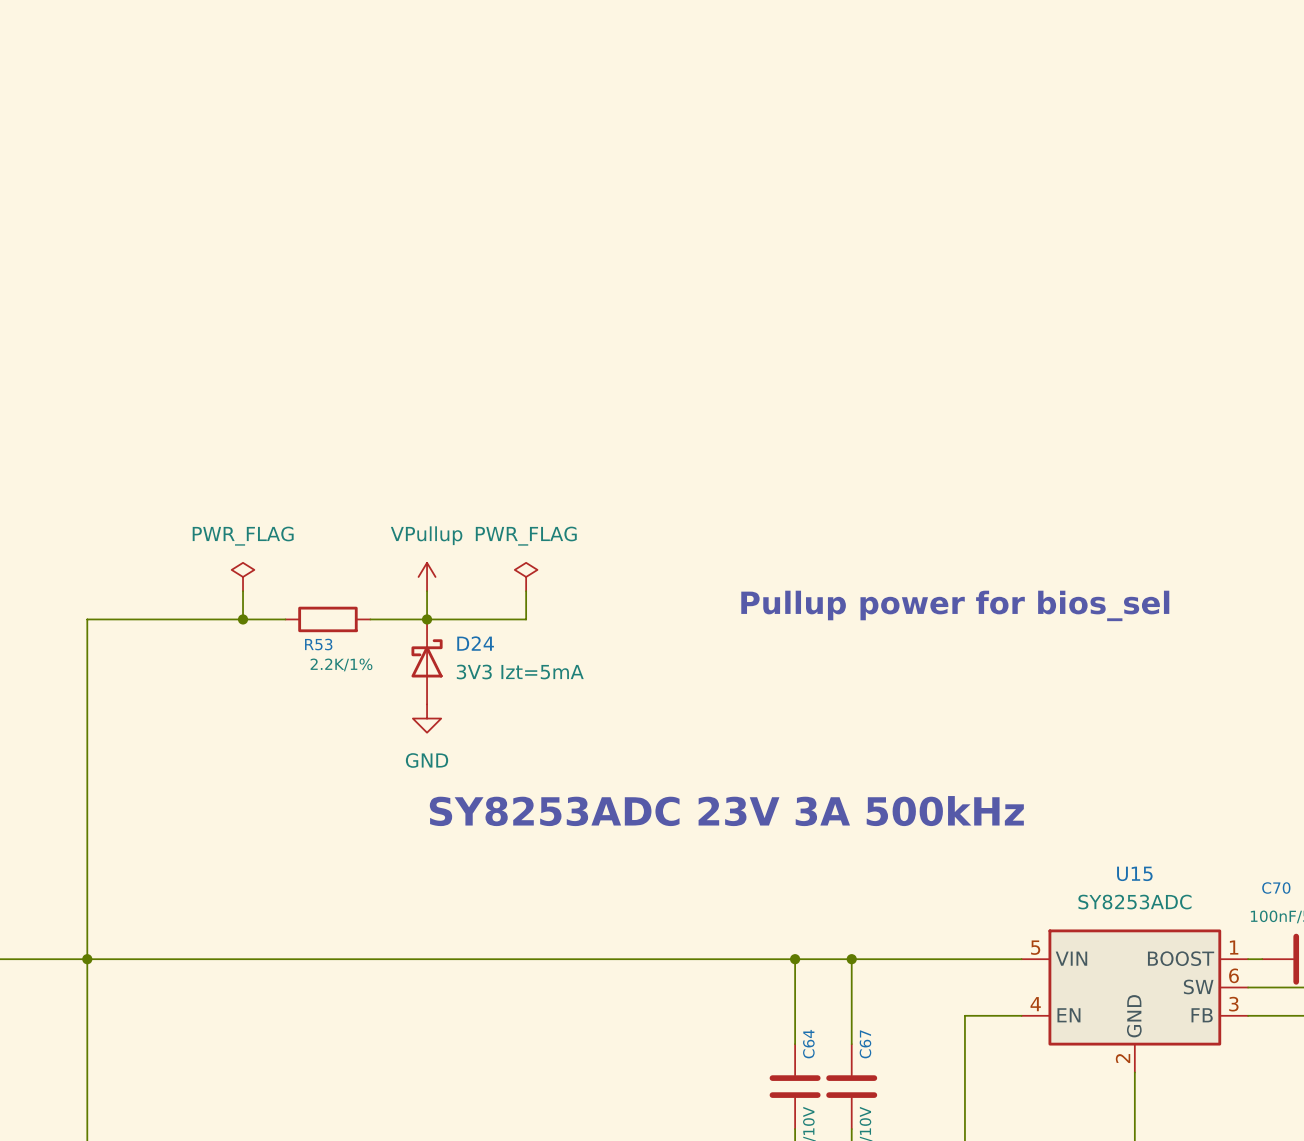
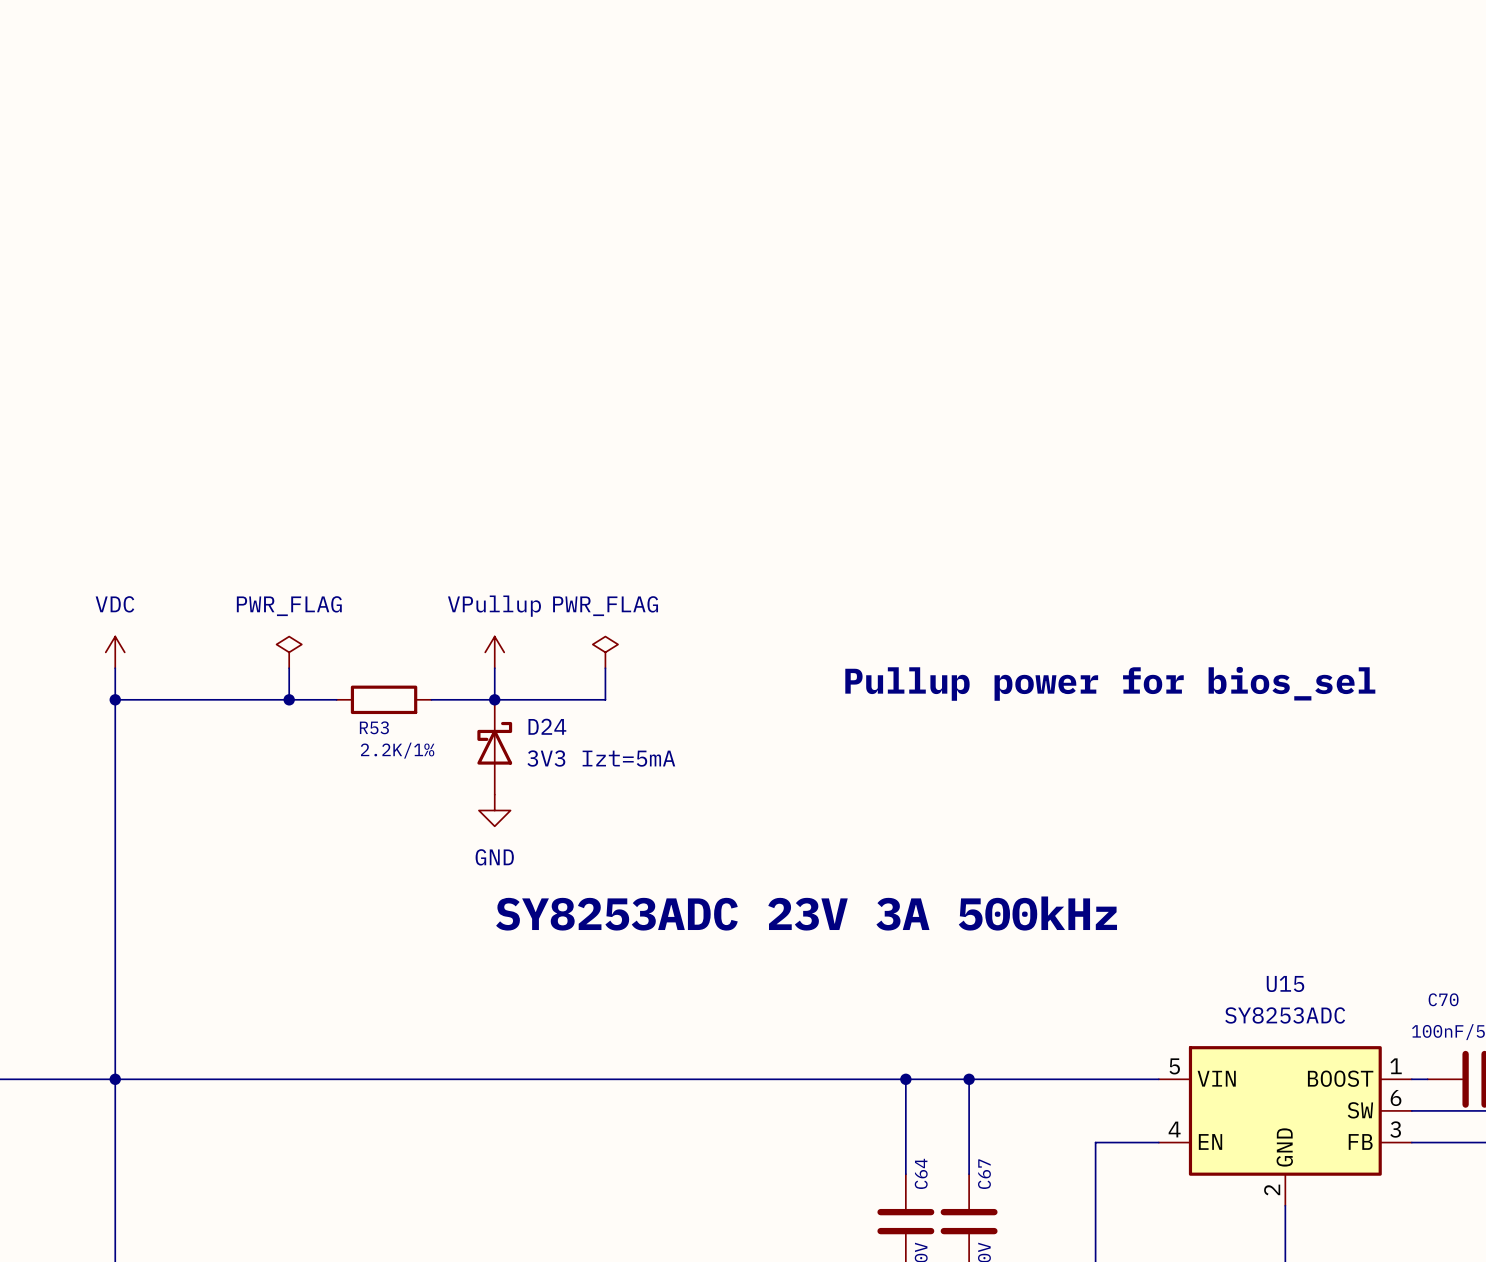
power symbol: none -> VDC (115, 652)
wire: none -> (115, 668) (115, 699)
junction: none -> (115, 699)

